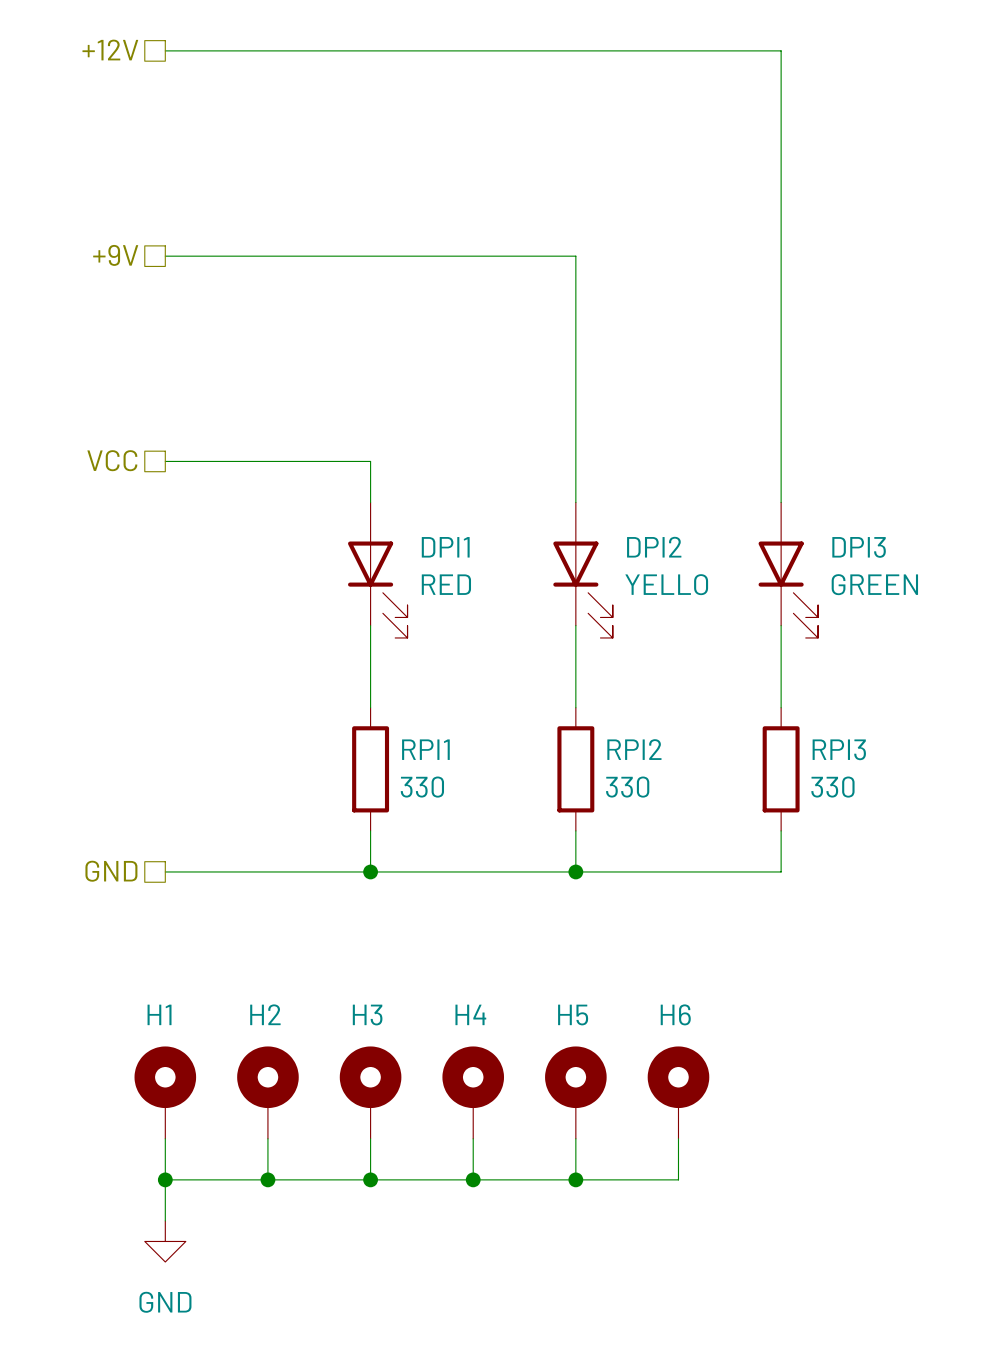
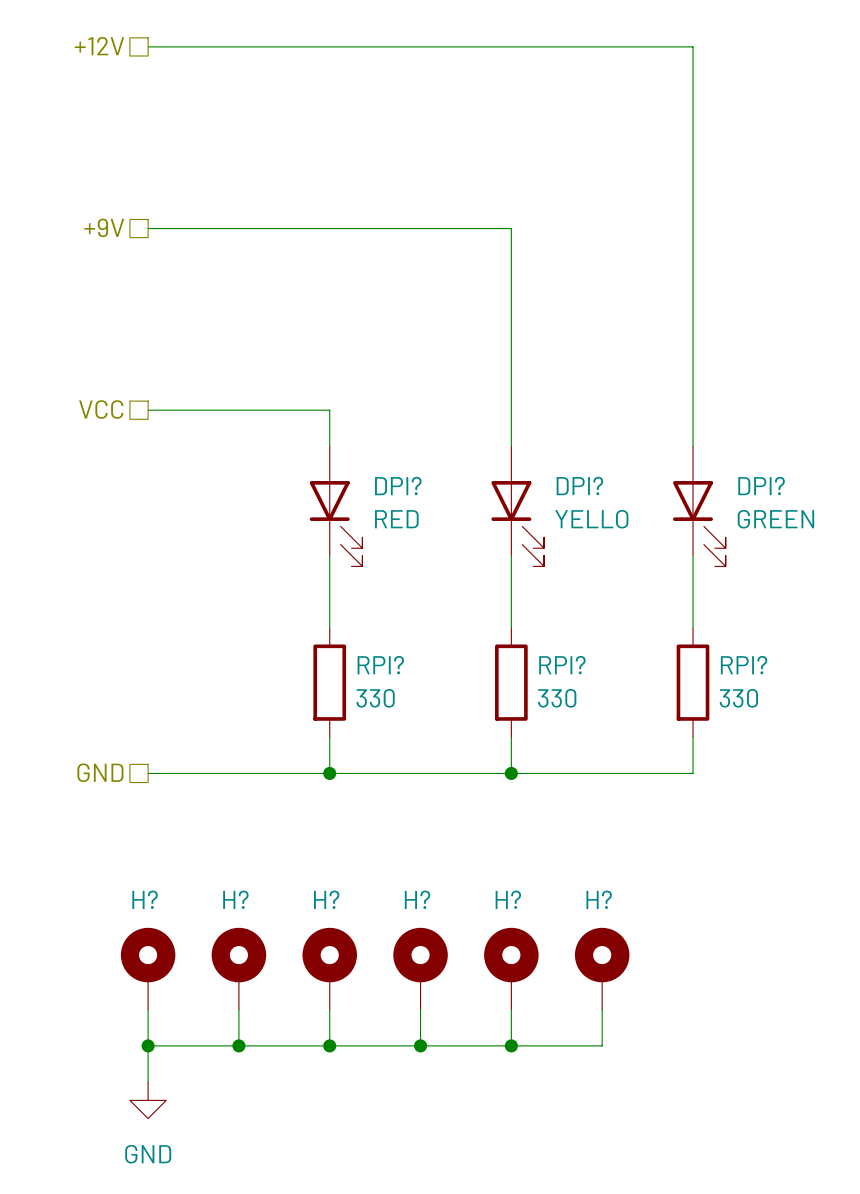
DPI1 name: DPI1 (445, 547) -> DPI? (398, 486)
DPI2 name: DPI2 (654, 547) -> DPI? (579, 486)
DPI3 name: DPI3 (859, 547) -> DPI? (761, 486)
RPI1 name: RPI1 (425, 749) -> RPI? (380, 665)
RPI2 name: RPI2 (634, 749) -> RPI? (562, 665)
RPI3 name: RPI3 (839, 749) -> RPI? (744, 665)
H1 name: H1 (159, 1014) -> H? (145, 899)
H2 name: H2 (265, 1014) -> H? (235, 899)
H4 name: H4 (470, 1014) -> H? (417, 899)
H6 name: H6 (675, 1014) -> H? (599, 899)
H3 name: H3 (367, 1015) -> H? (326, 899)
H5 name: H5 (573, 1015) -> H? (508, 899)

